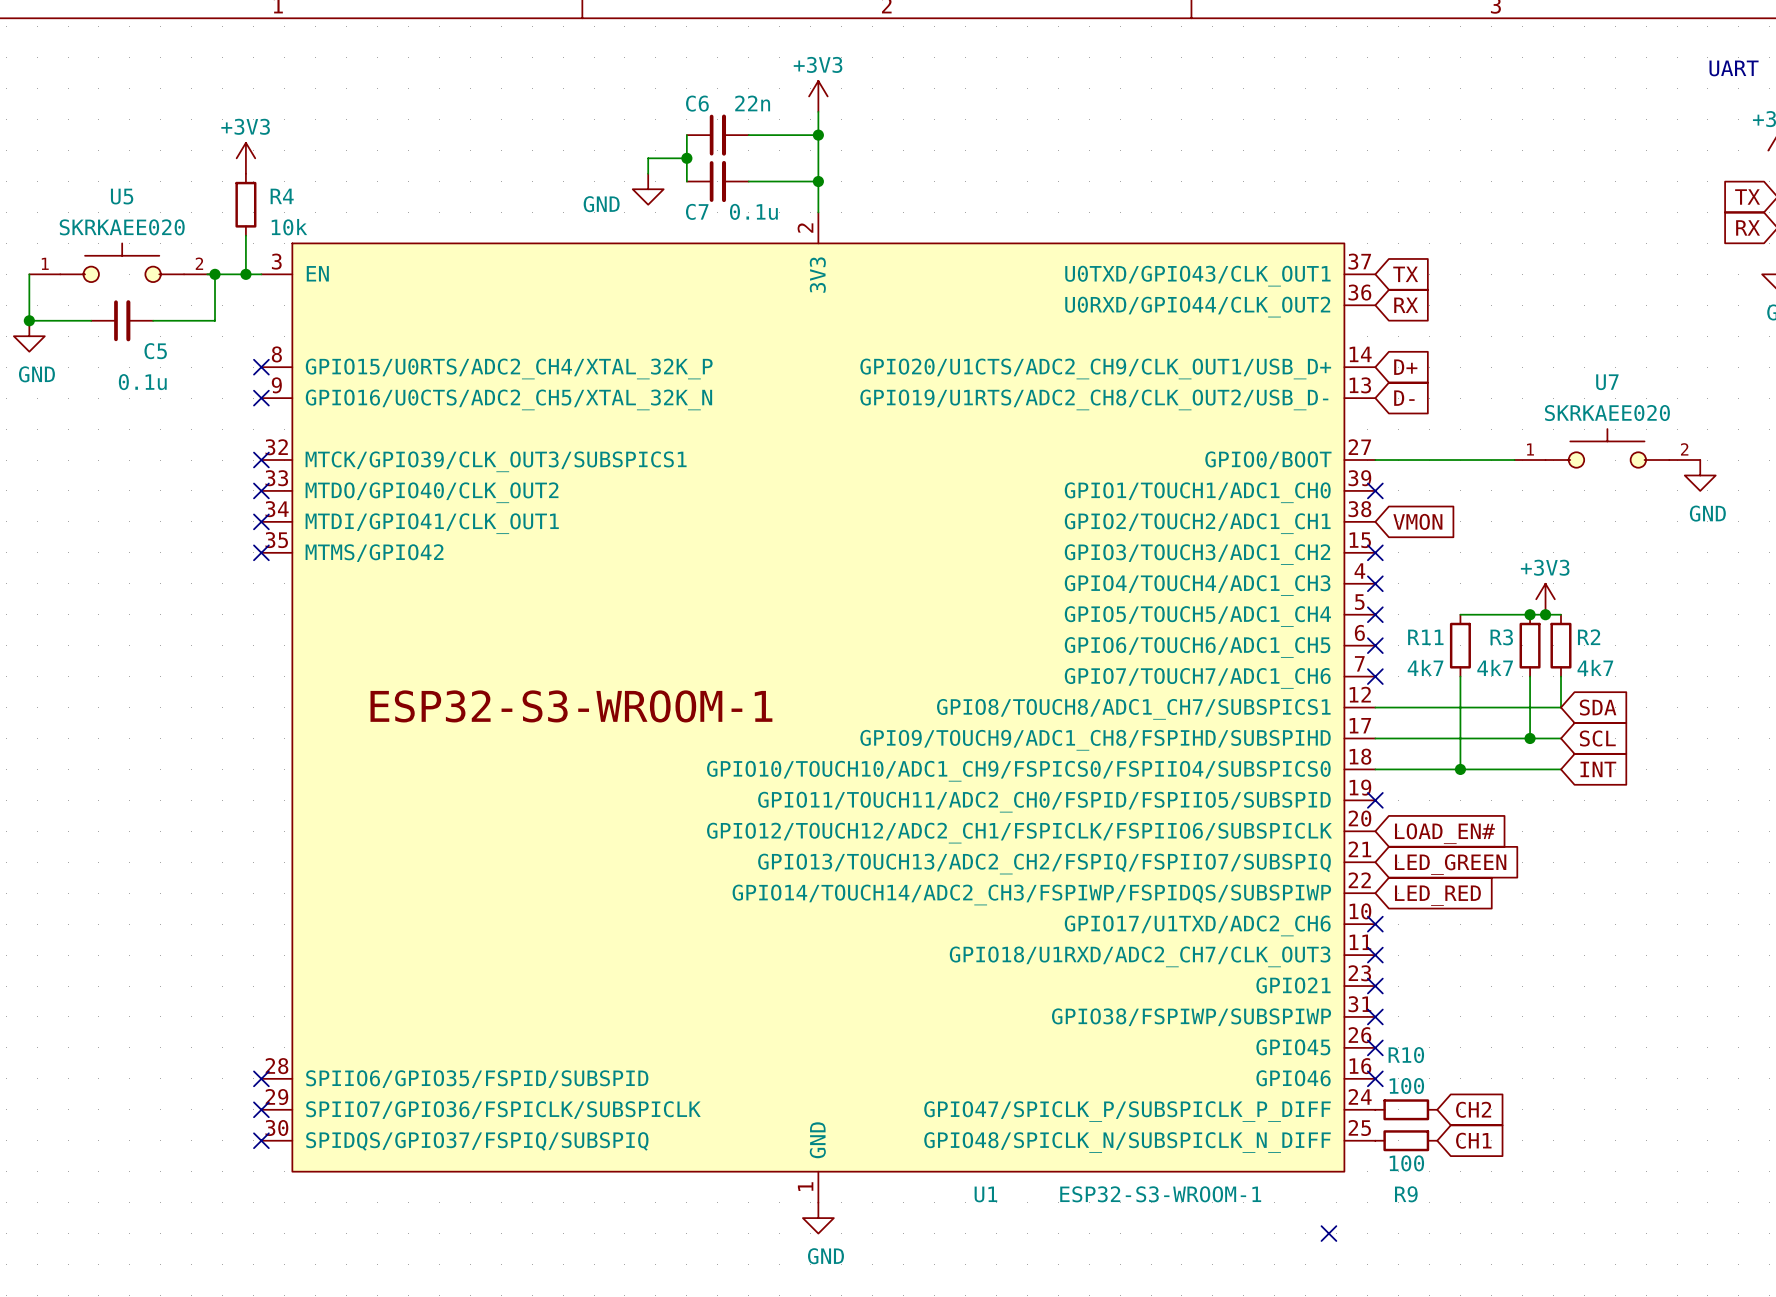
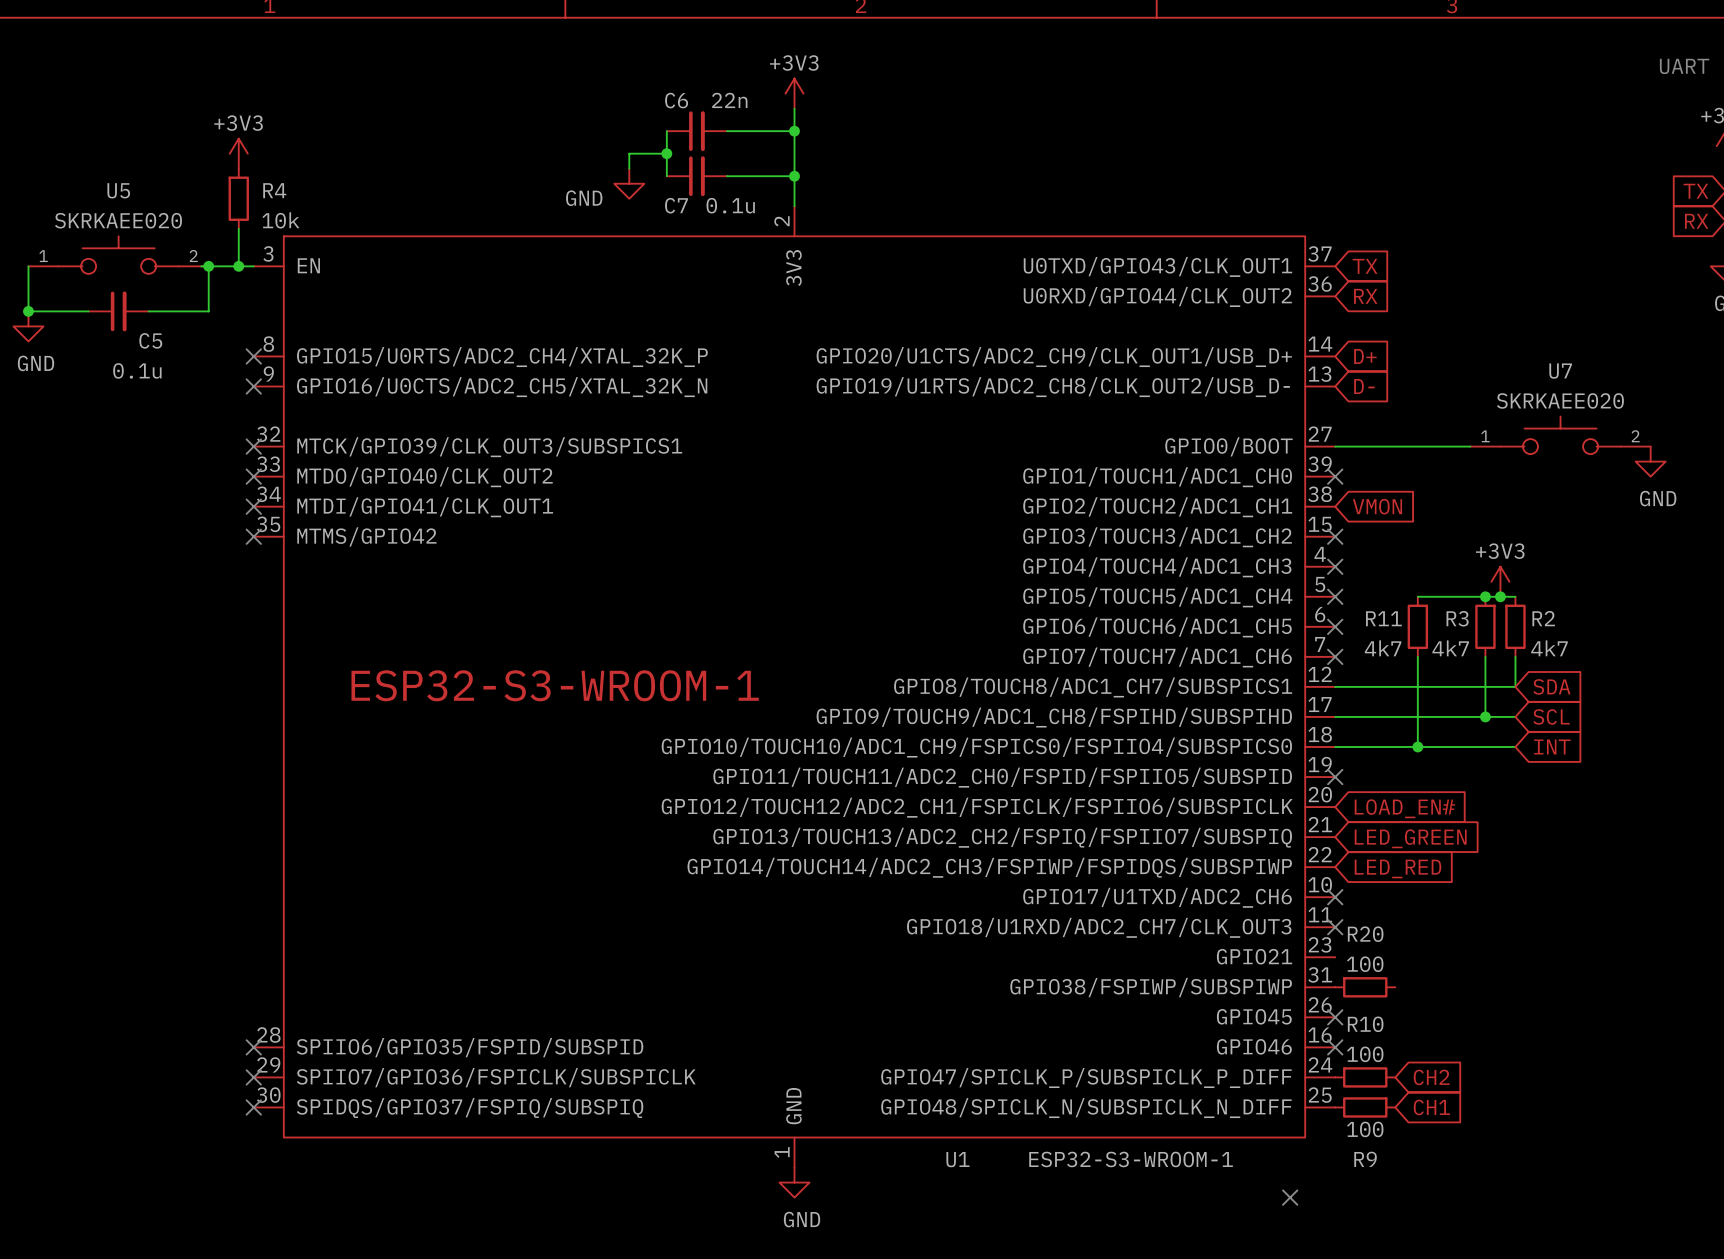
no-connect mark: (1375, 986) -> none
no-connect mark: (1375, 1016) -> none
R20: none -> 100 (1365, 987)

